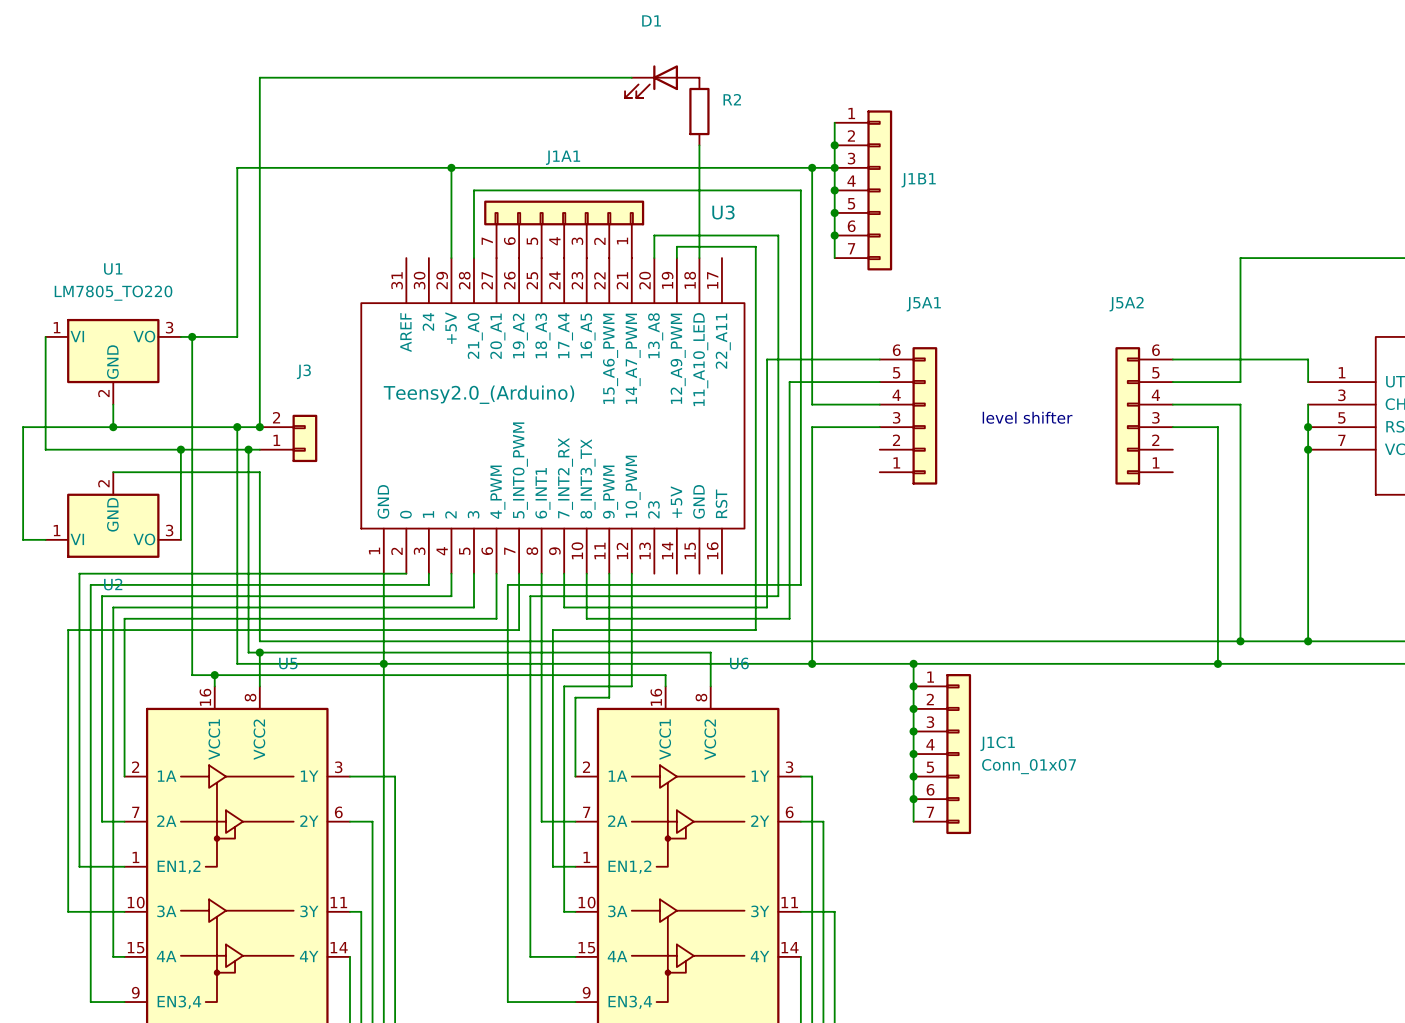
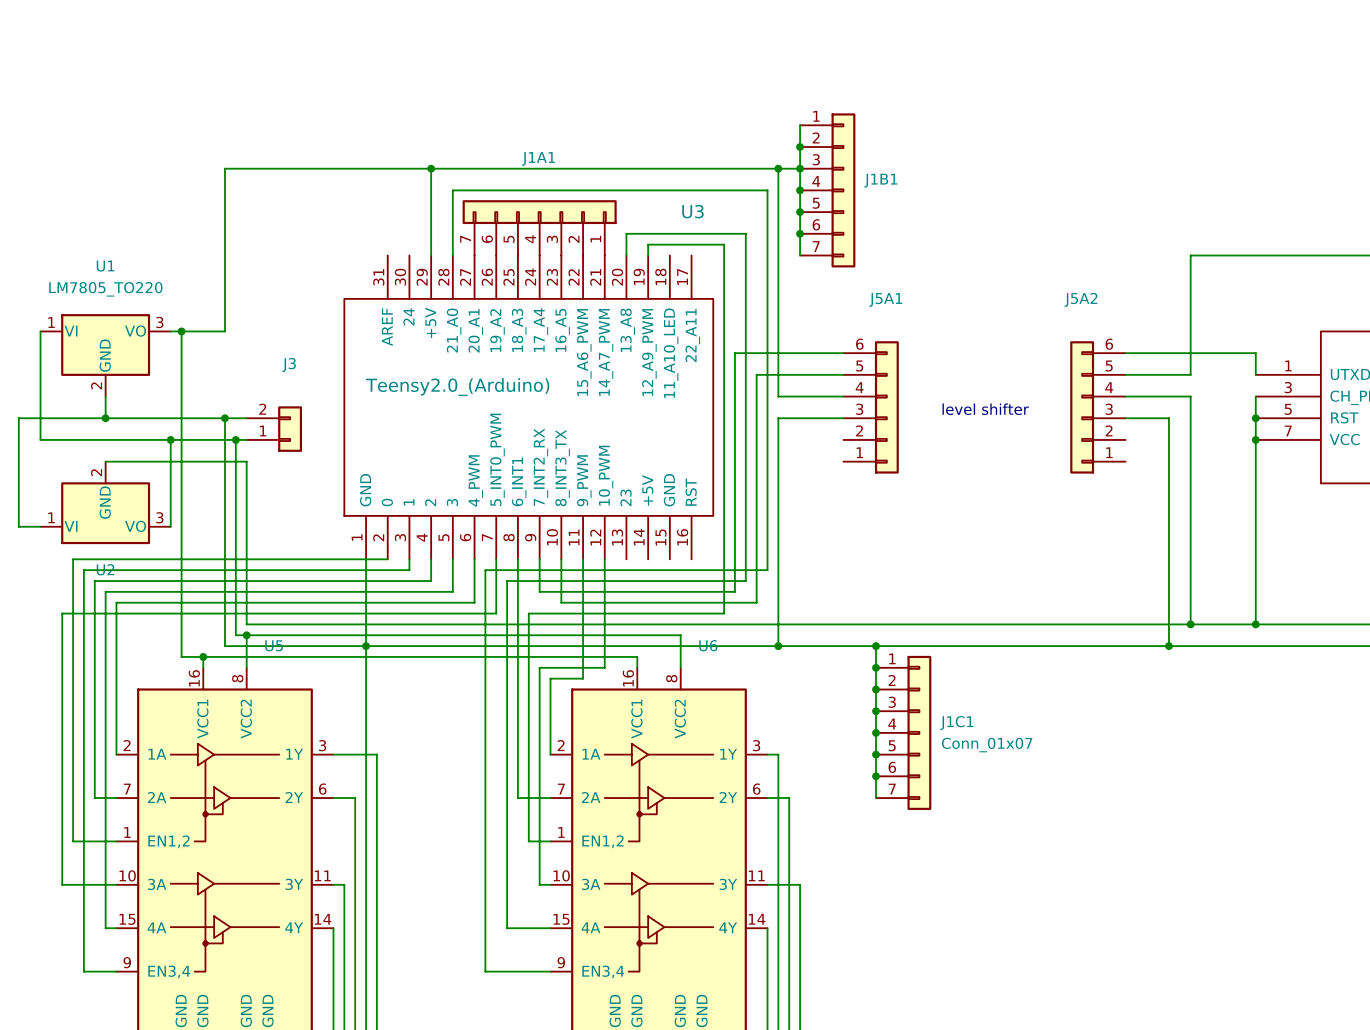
wire: (631, 77) (259, 77) (259, 427) -> none
D1: (662, 81) -> none
R2: (699, 111) -> none
wire: (699, 145) (699, 258) -> none
junction: (259, 427) -> none

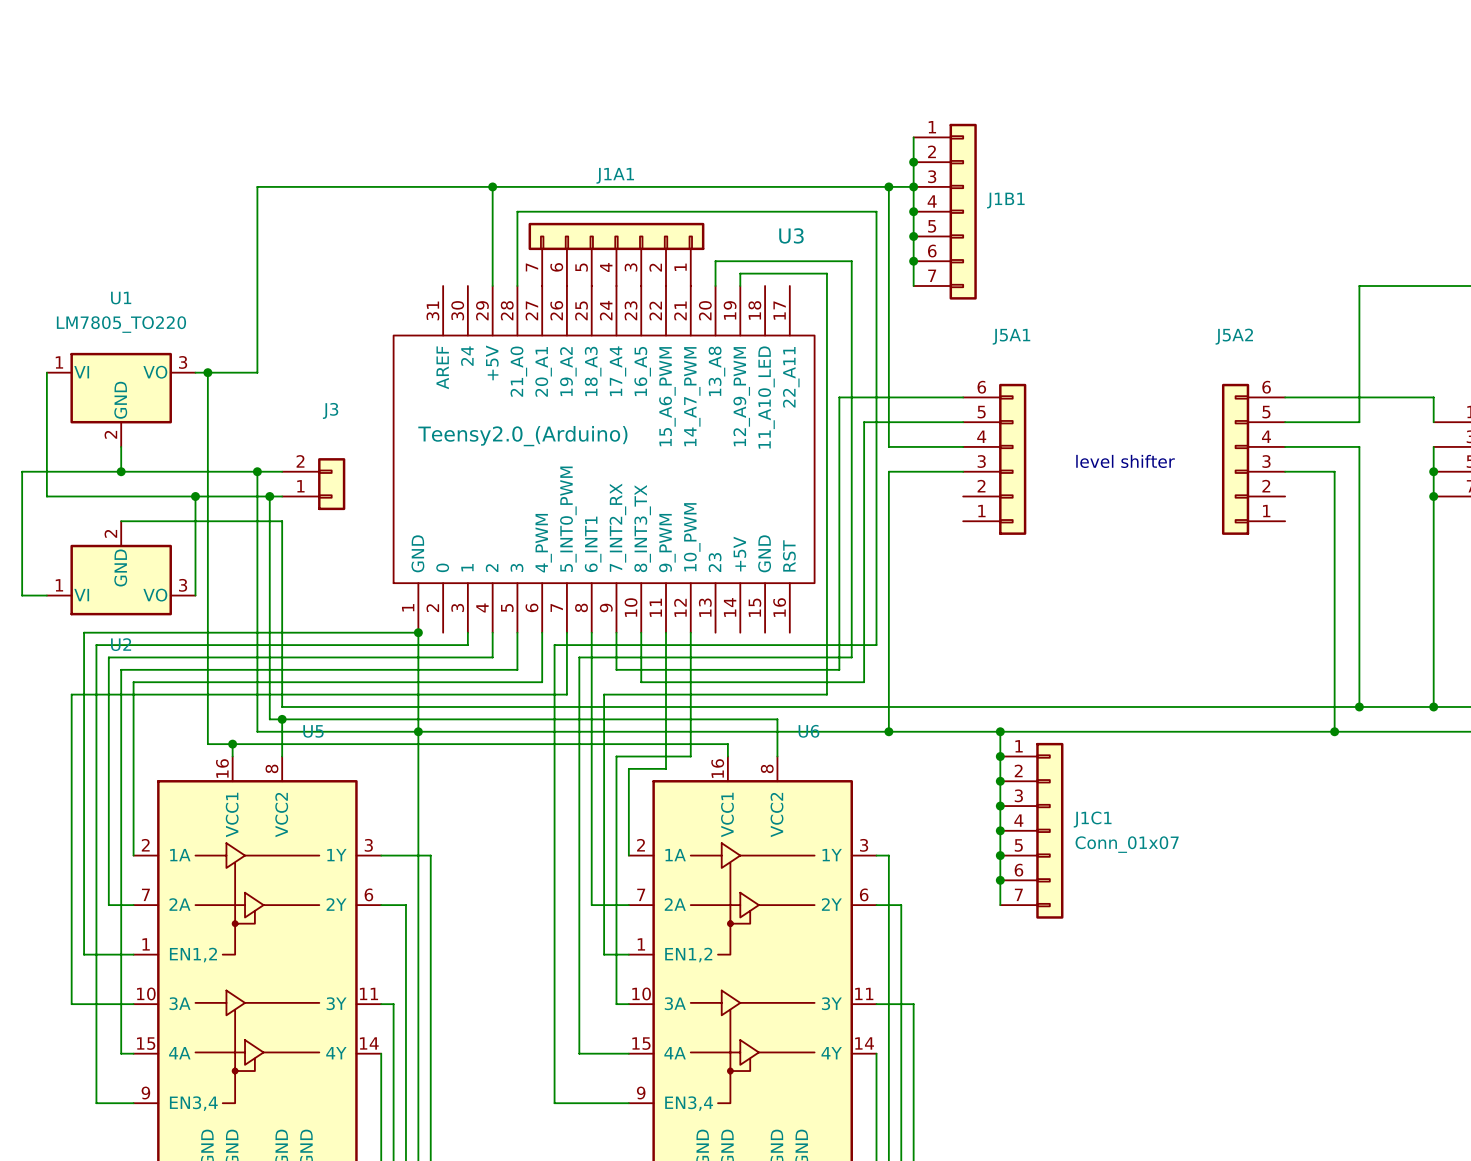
wire: (366, 559) (387, 559) -> none
junction: none -> (418, 632)

